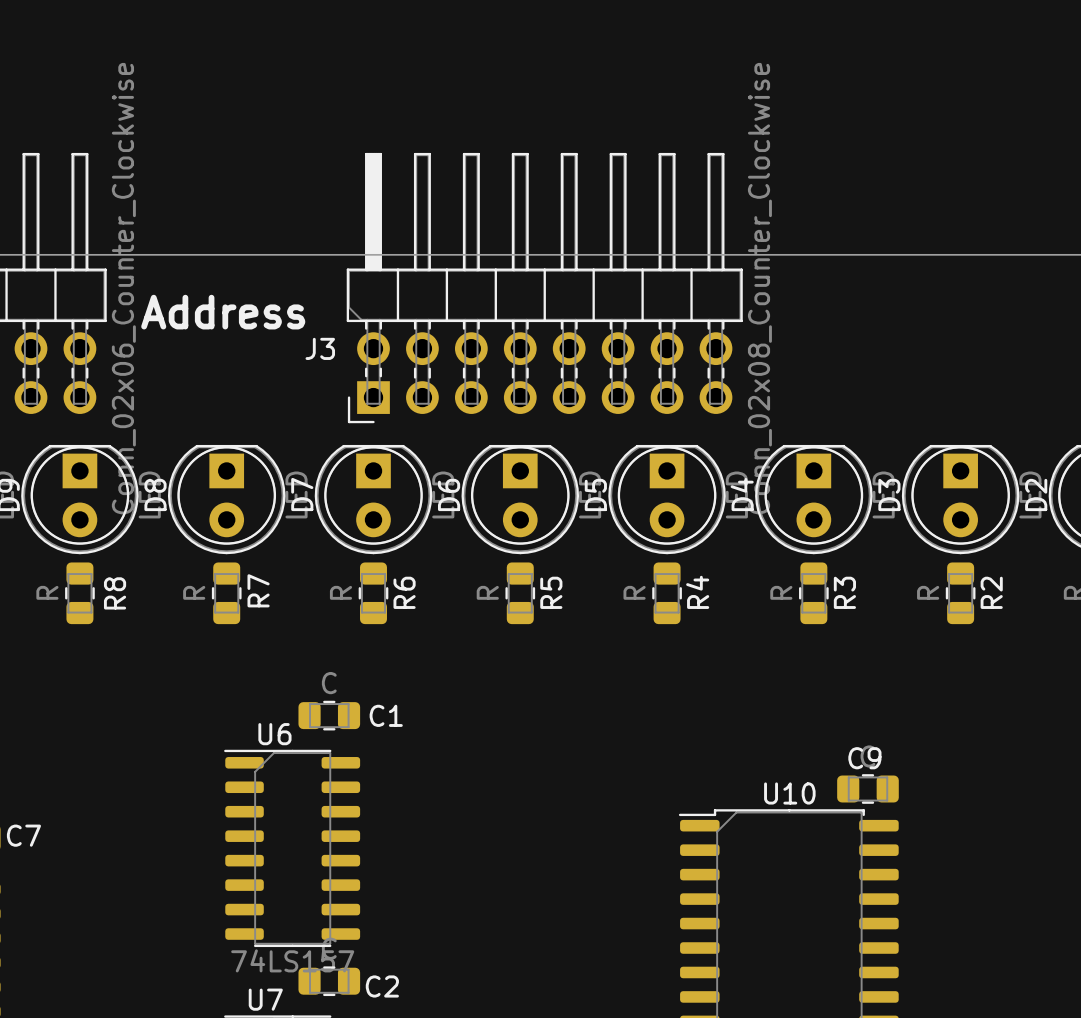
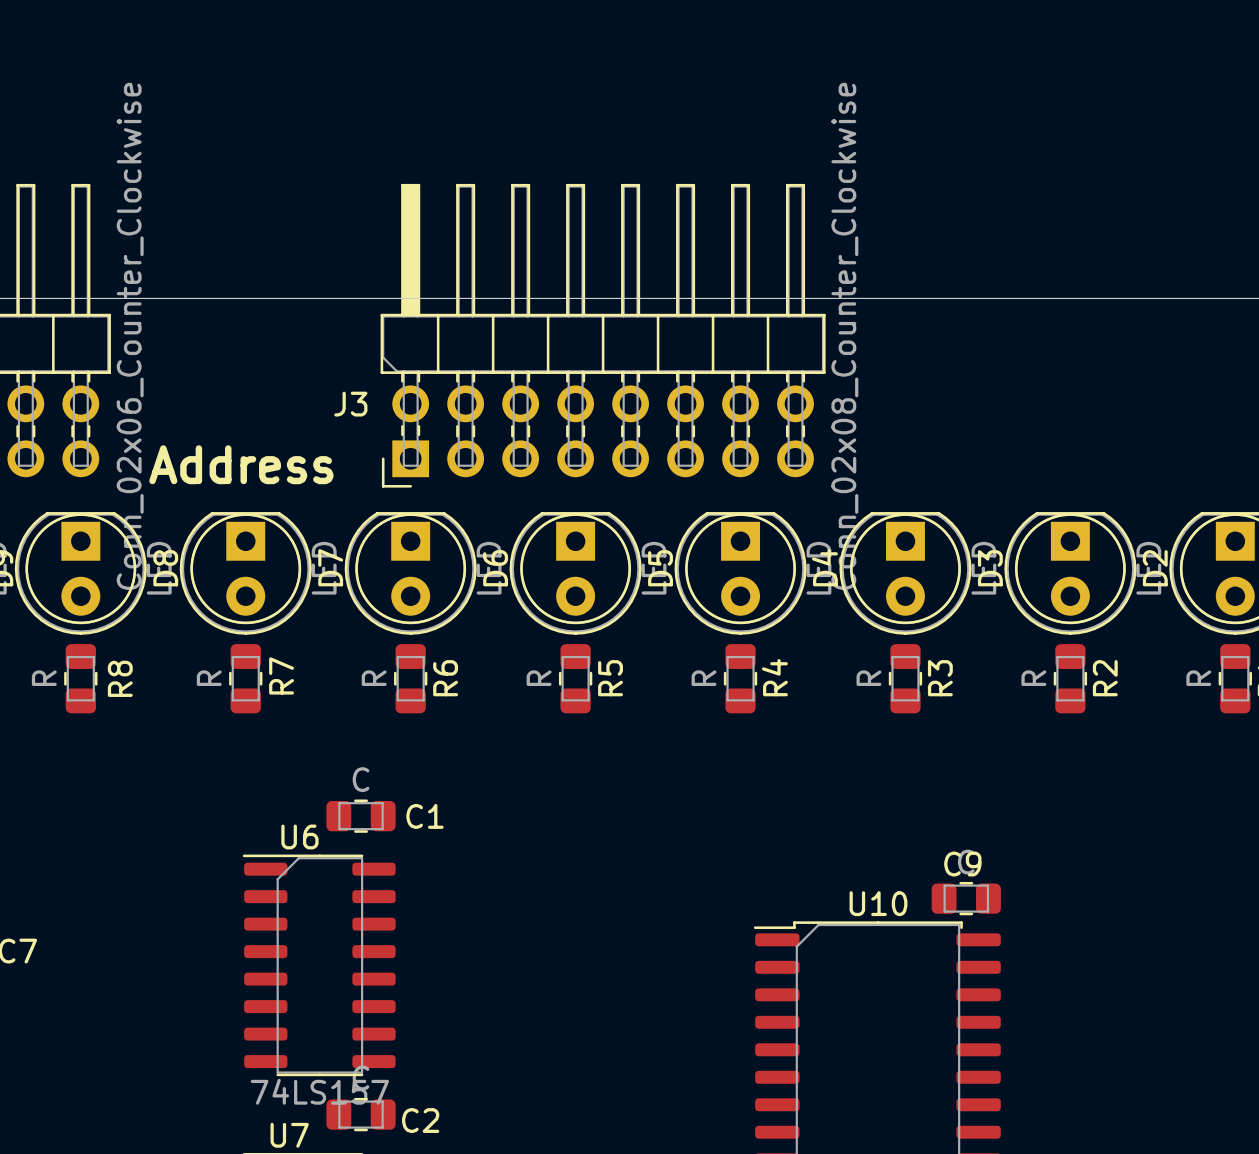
text position: Address (223, 312) -> Address (241, 464)

